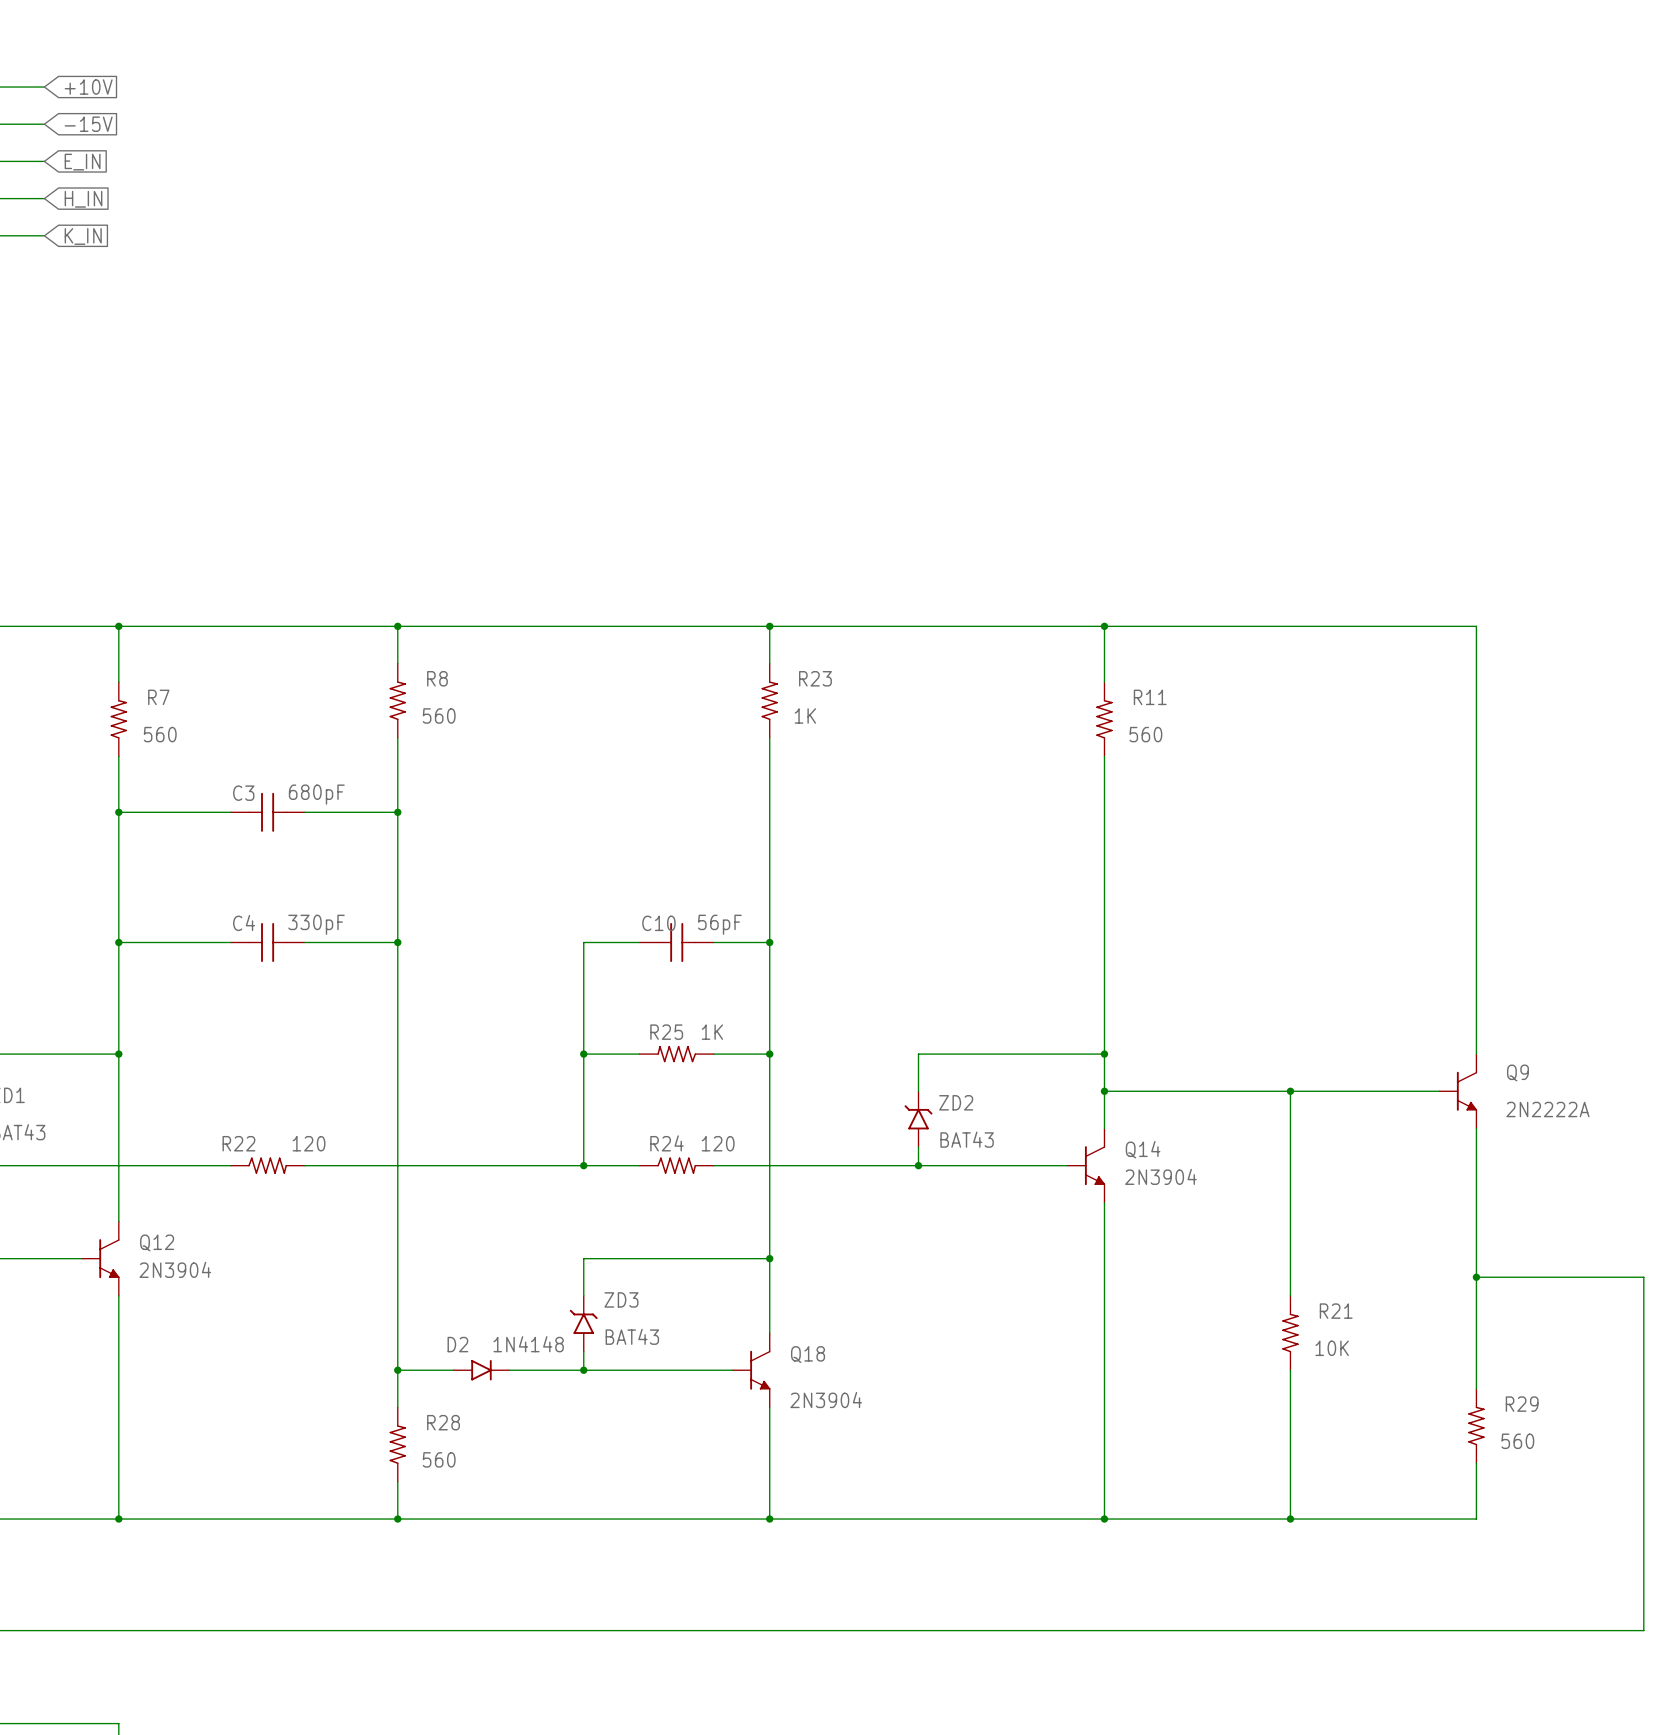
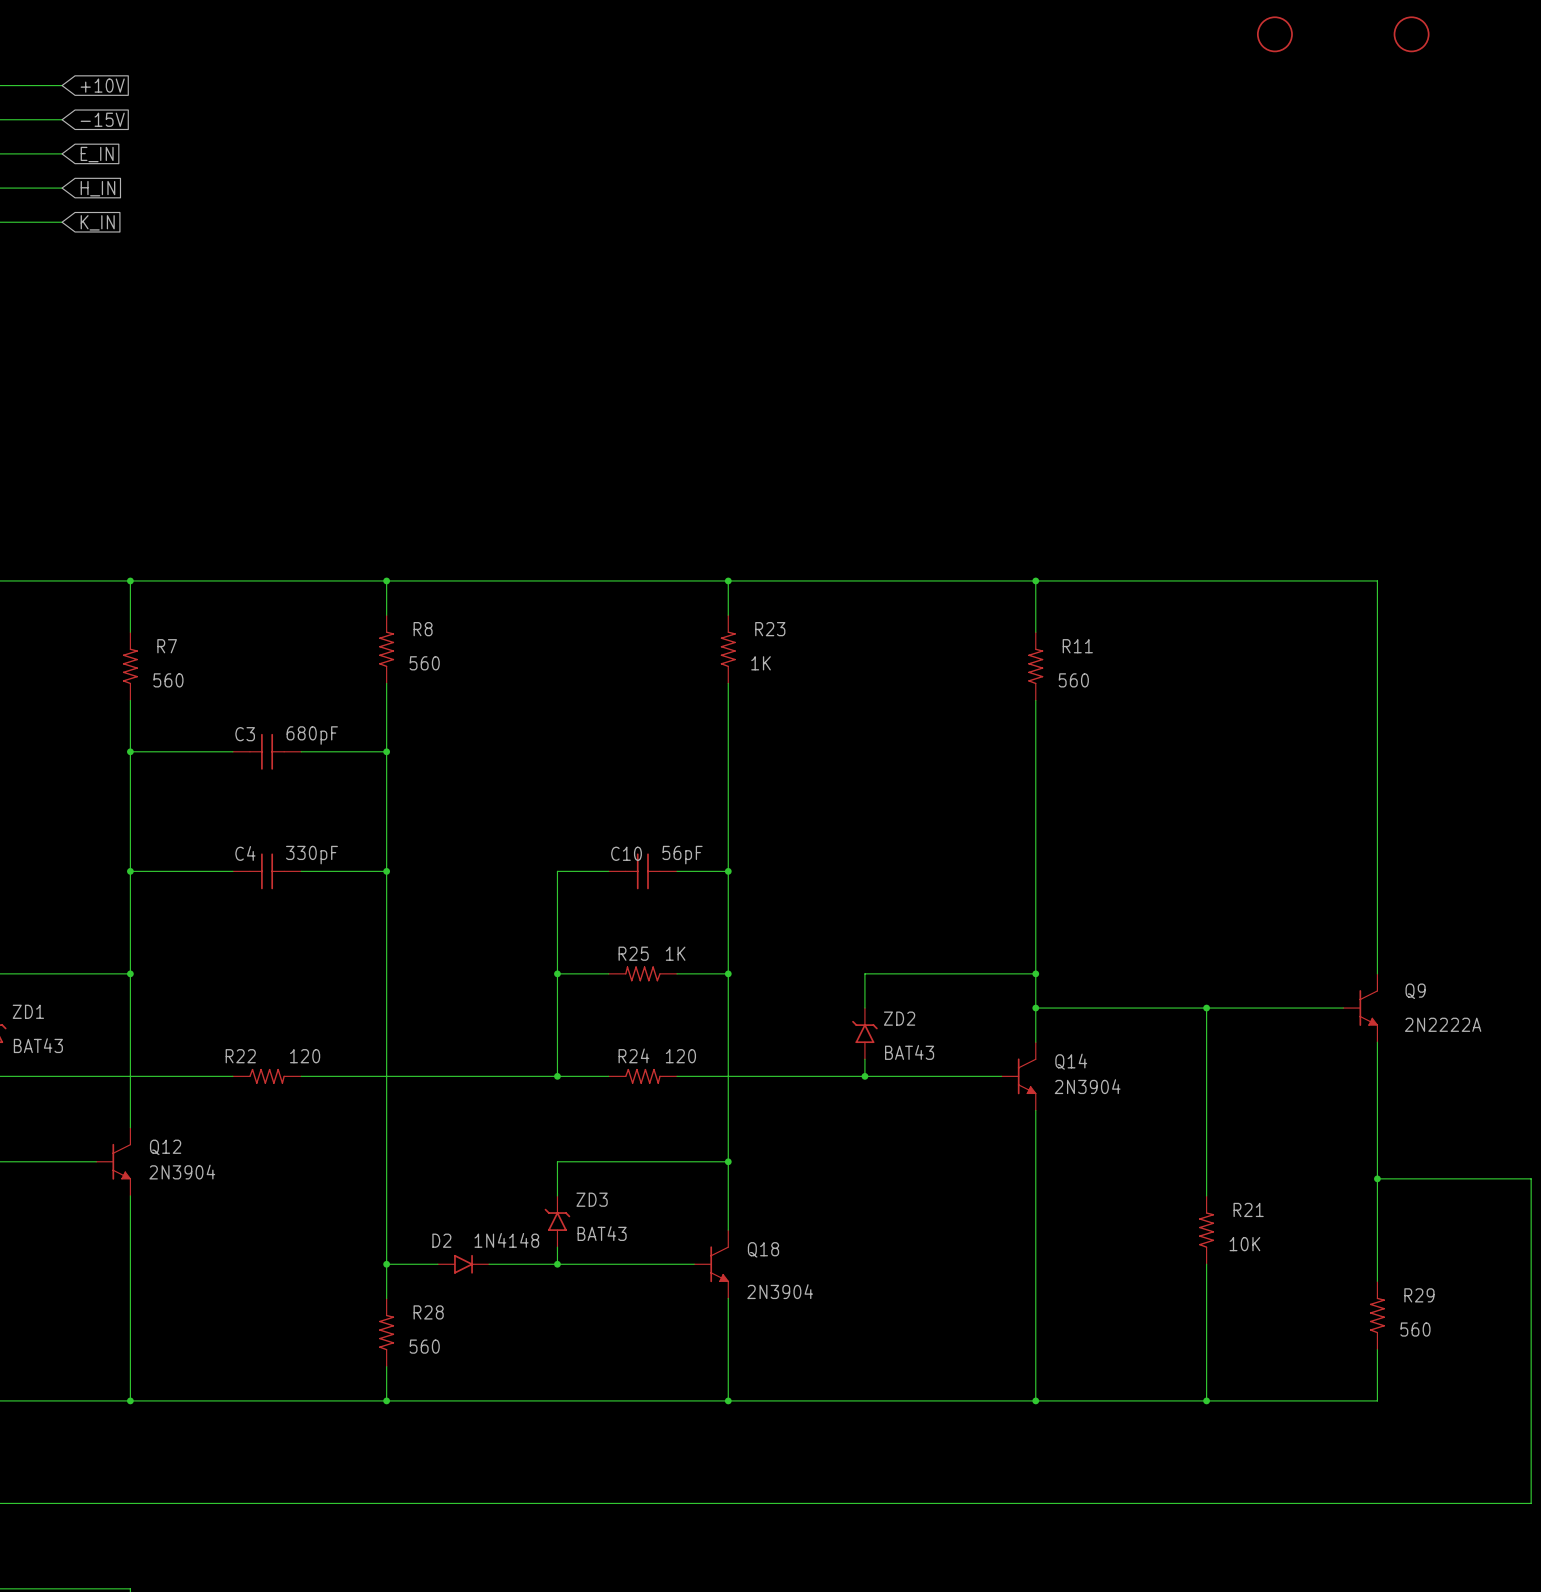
part: none -> (1274, 34)
part: none -> (1411, 34)

